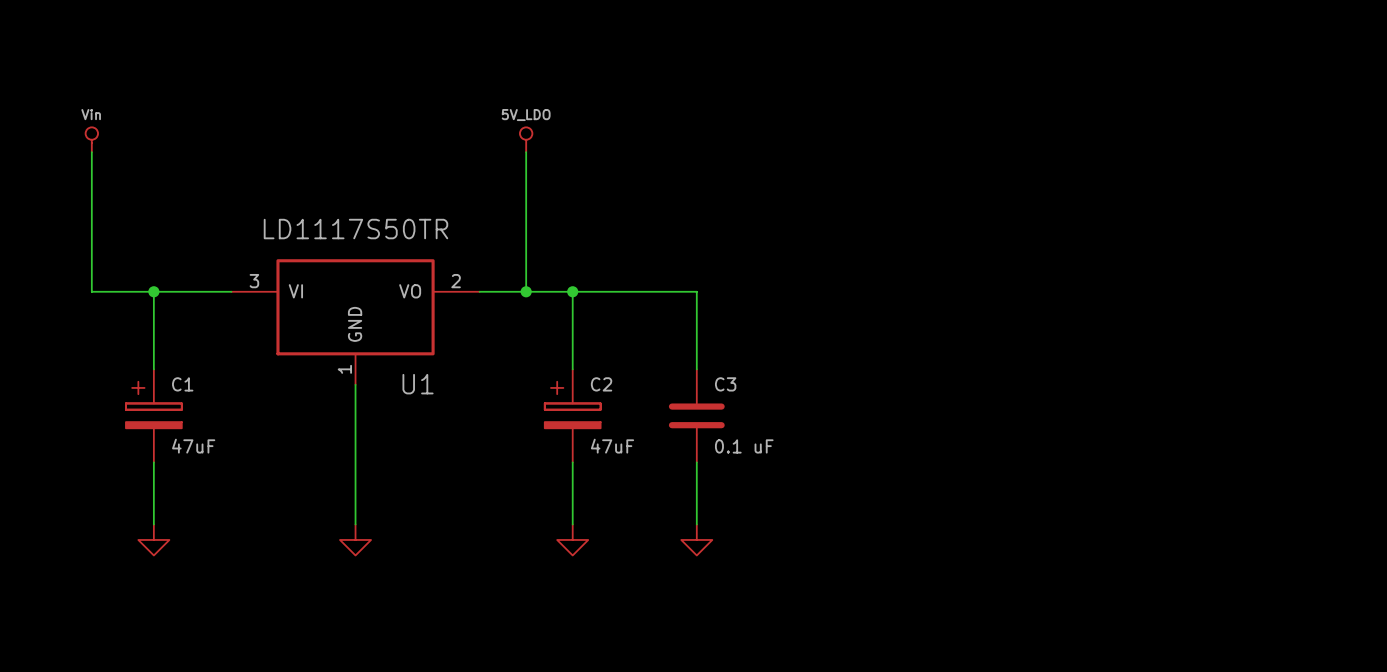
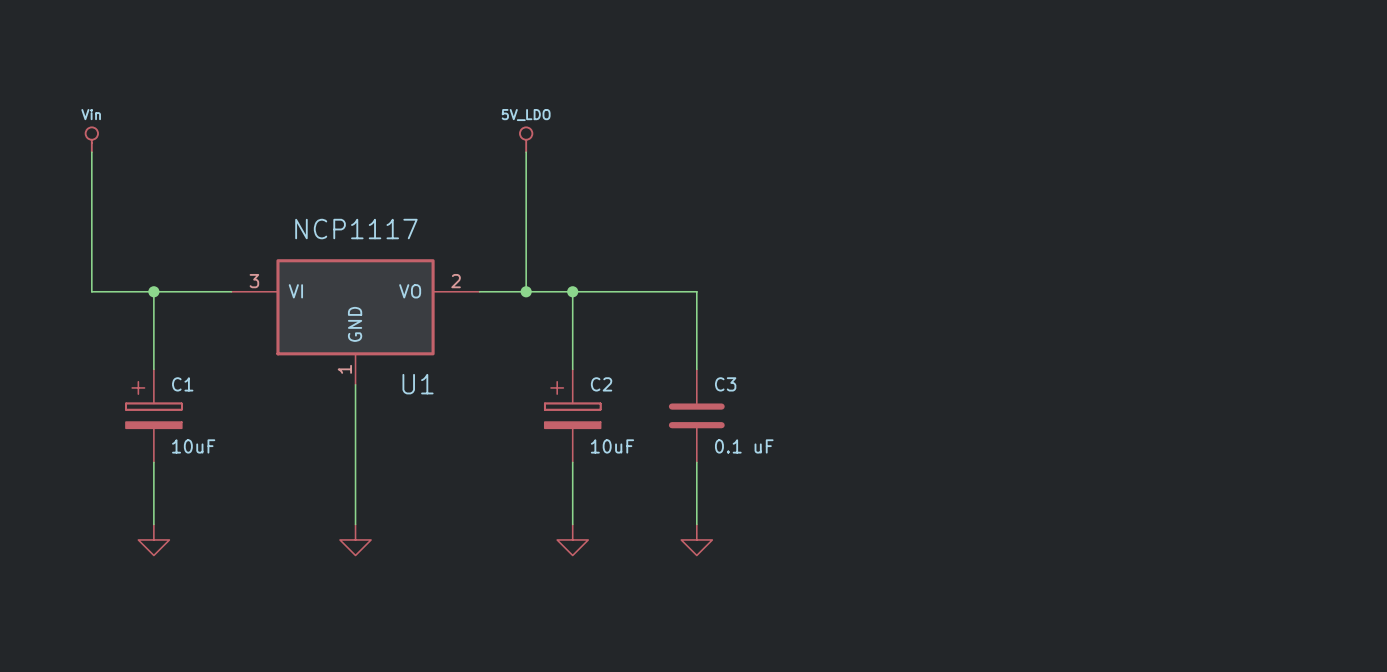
U1 value: LD1117S50TR (355, 229) -> NCP1117 (356, 229)
C1 value: 47uF (193, 446) -> 10uF (193, 446)
C2 value: 47uF (612, 446) -> 10uF (612, 446)

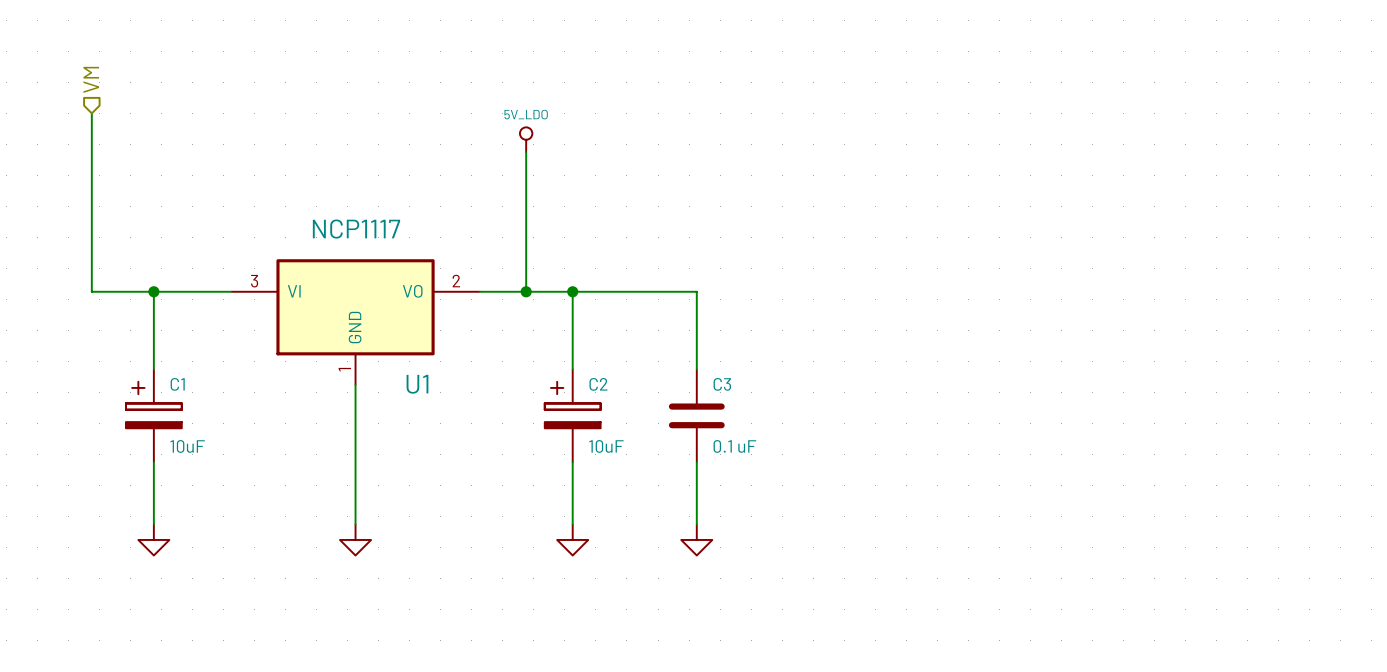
hierarchical label: none -> VM (91, 79)
wire: none -> (91, 113) (91, 152)
power symbol: Vin (91, 139) -> none

